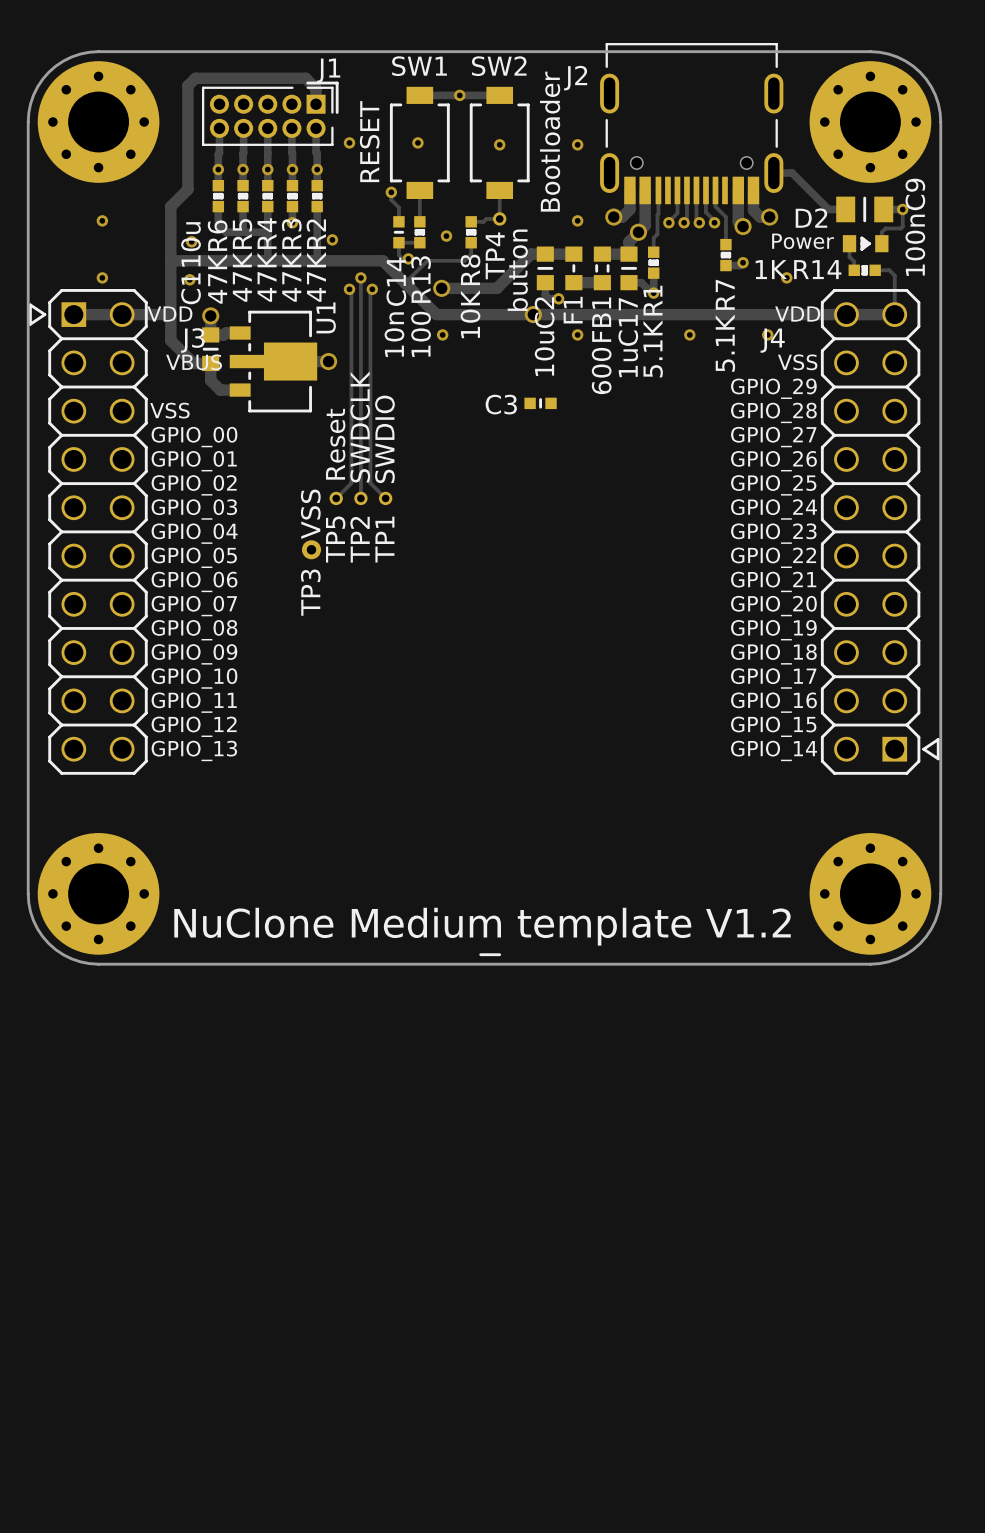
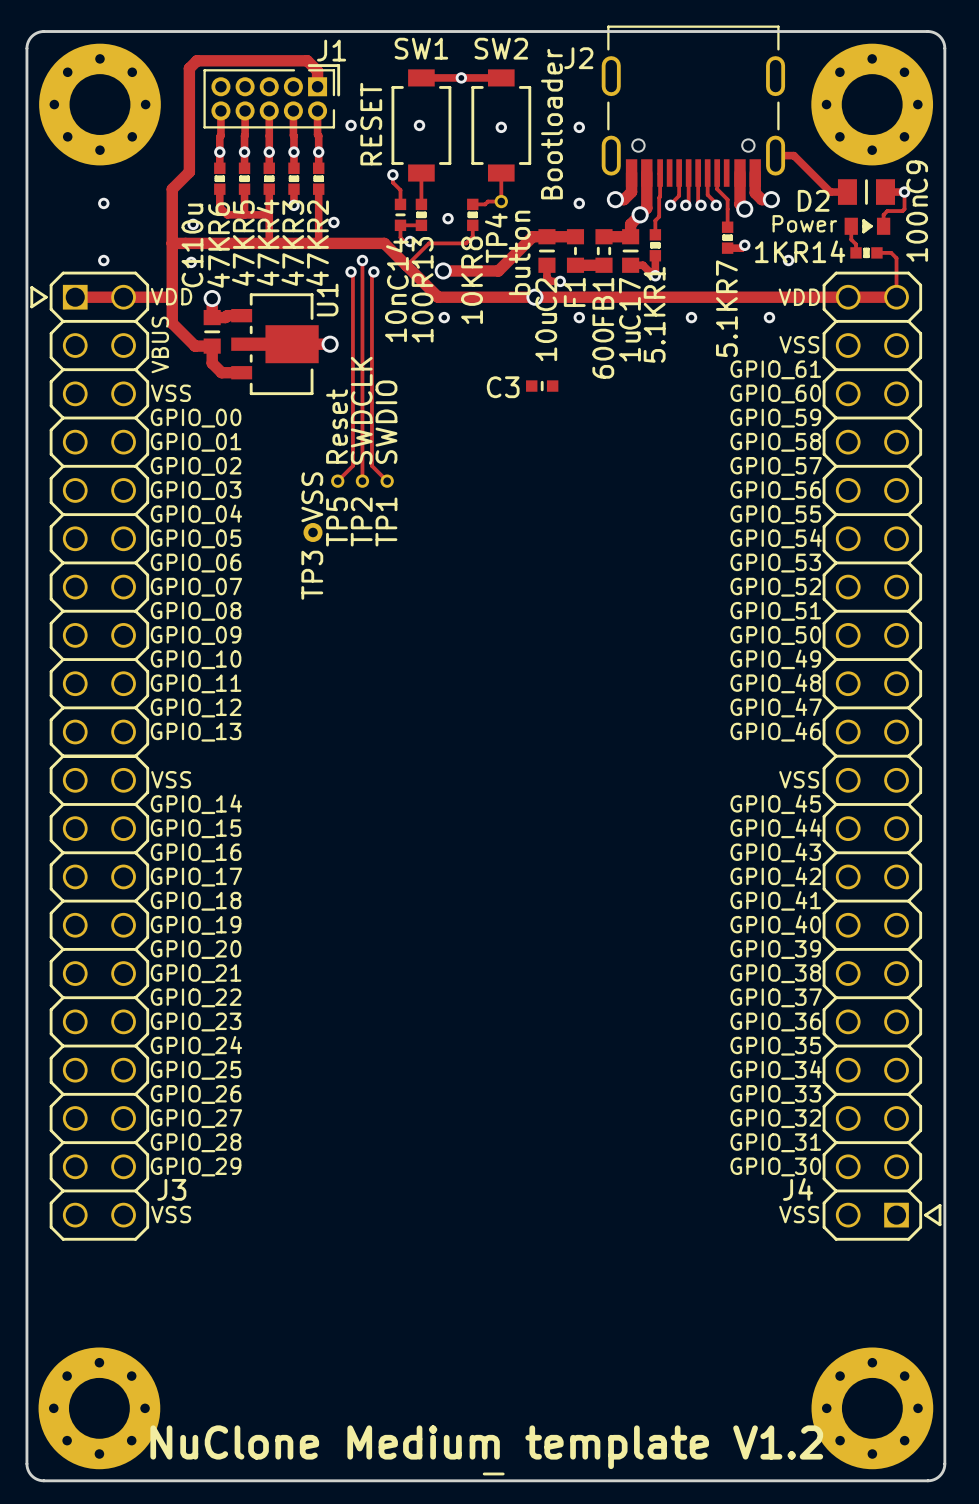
board edge: (98, 51) (870, 51) (897, 57) (920, 72) (935, 95) (940, 122) (940, 893) (935, 920) (920, 943) (897, 958) (870, 964) (98, 964) (71, 958) (48, 943) (33, 920) (28, 893) (28, 122) (33, 95) (48, 72) (71, 57) (98, 51) -> (43, 31) (31, 36) (26, 48) (26, 1463) (29, 1472) (35, 1478) (43, 1480) (927, 1480) (936, 1478) (942, 1472) (944, 1463) (944, 48) (942, 39) (936, 33) (927, 31) (43, 31)
J3 footprint: [28, 289, 148, 775] -> [30, 271, 150, 1241]
J4 footprint: [820, 289, 940, 775] -> [822, 271, 942, 1241]
J3 name position: J3 (192, 340) -> J3 (171, 1189)
J4 name position: J4 (772, 340) -> J4 (798, 1189)
part: (98, 893) -> none
part: (870, 893) -> none
drawing: [479, 953, 502, 957] -> none
part: none -> (99, 1408)
part: none -> (872, 1408)
drawing: none -> [482, 1472, 505, 1476]

